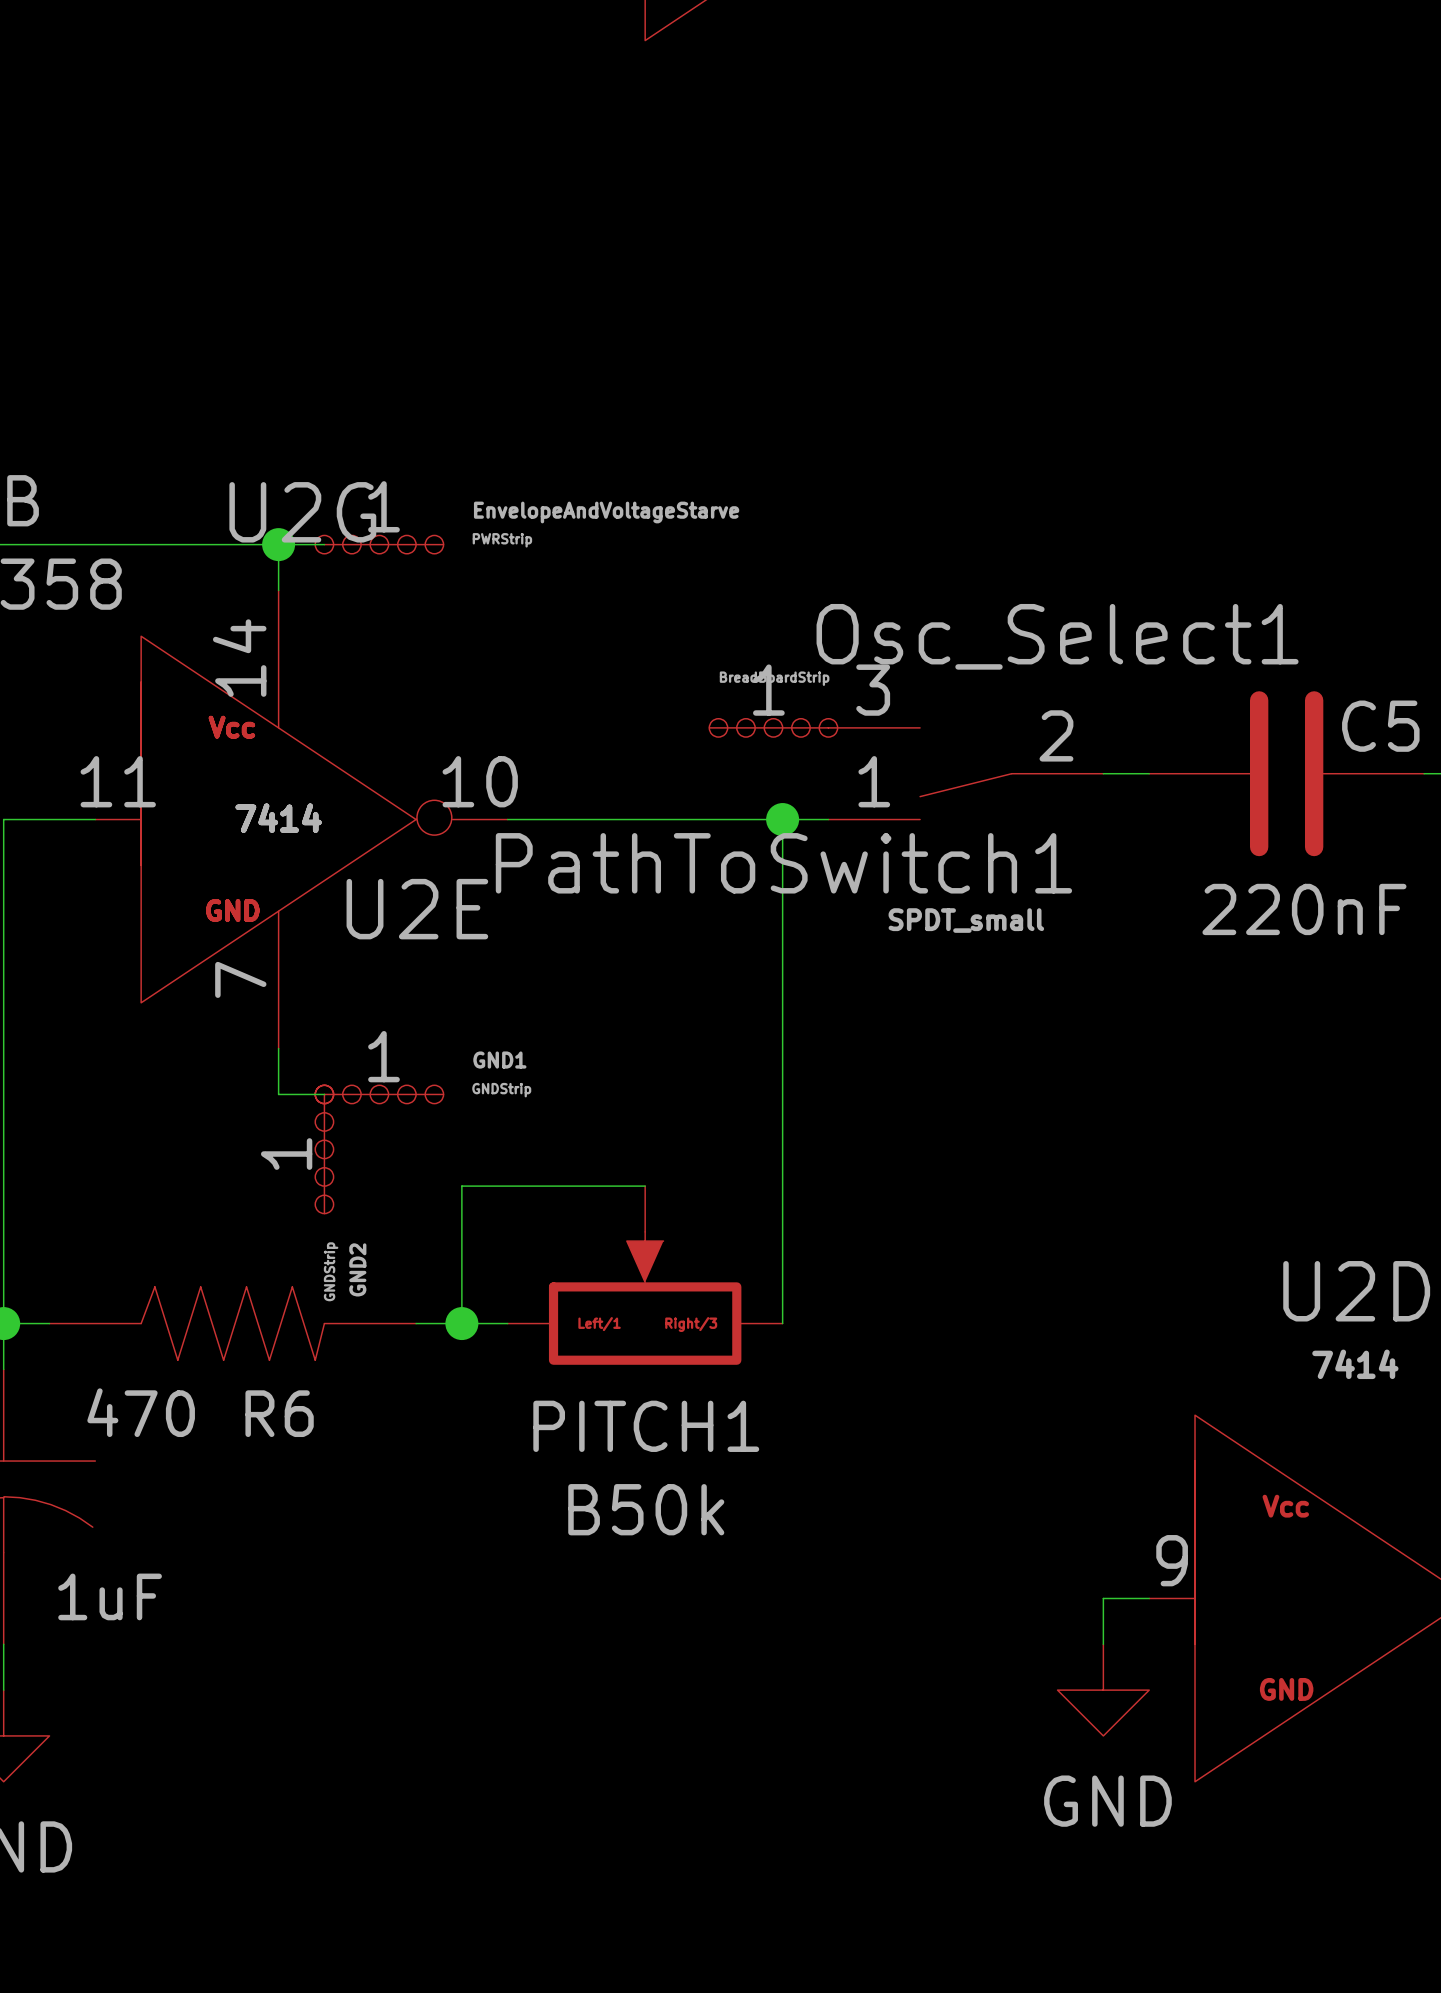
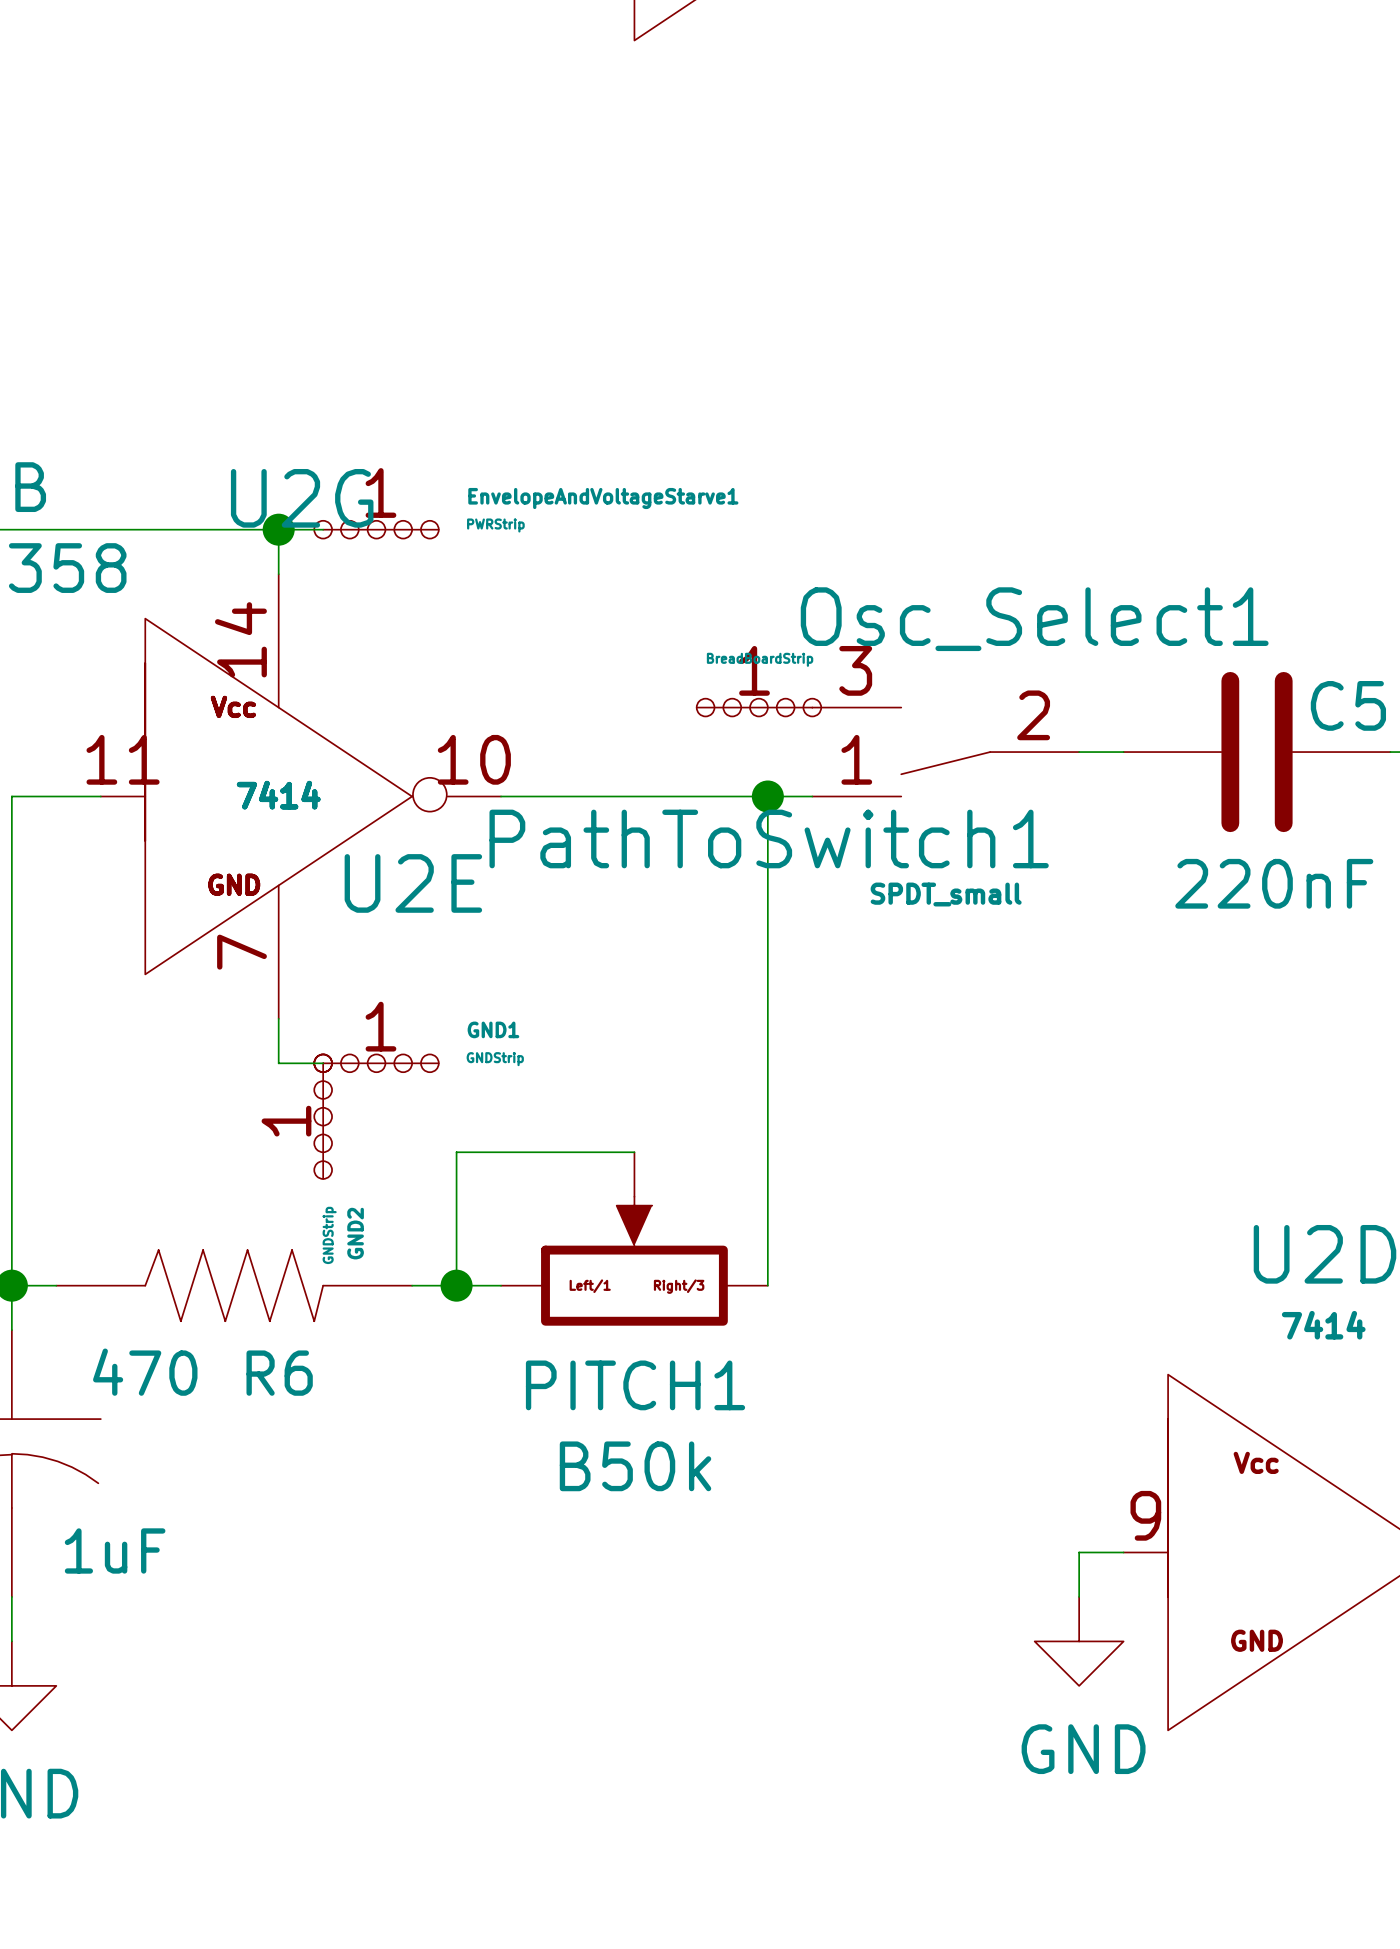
EnvelopeAndVoltageStarve name: EnvelopeAndVoltageStarve (606, 512) -> EnvelopeAndVoltageStarve1 (603, 498)

